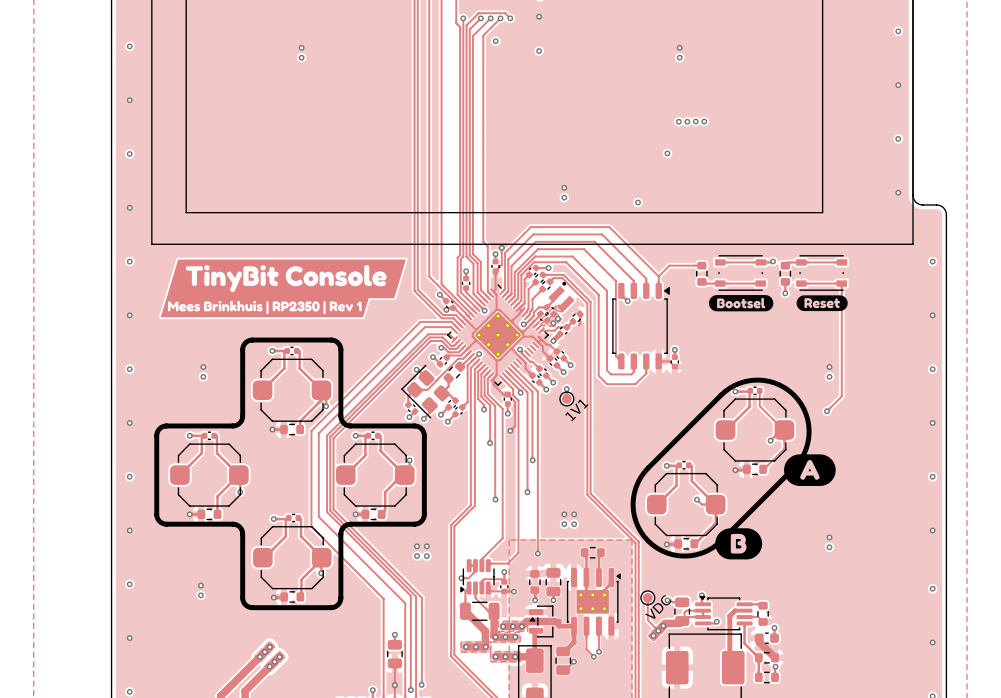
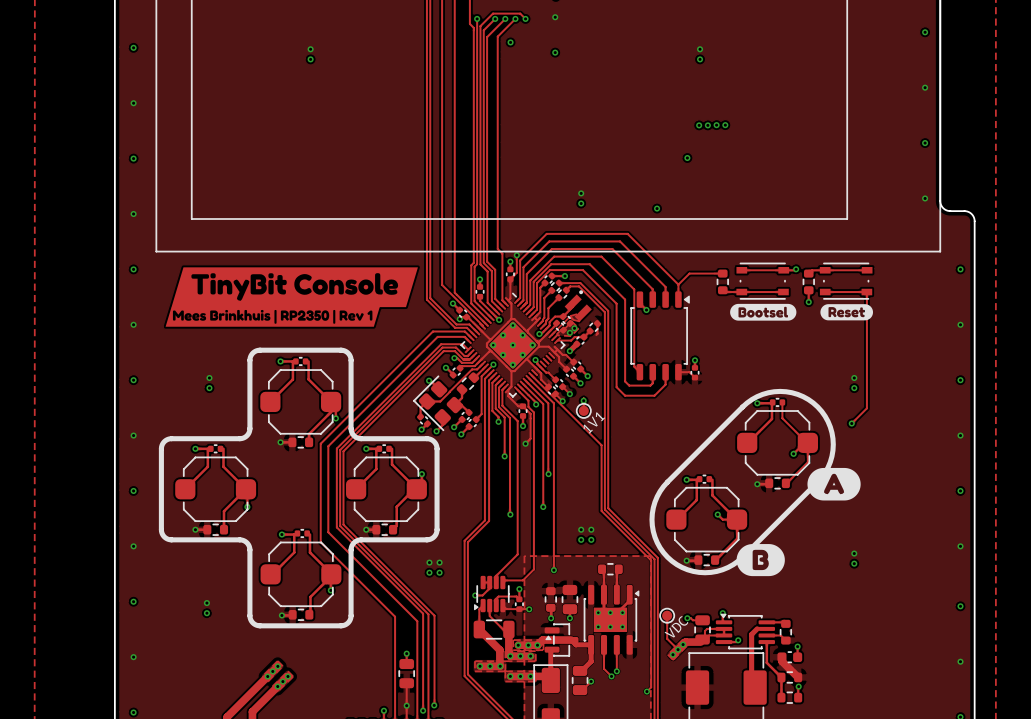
track: none -> (531, 375) (601, 445) (601, 510) (651, 560) (651, 687) (646, 691)
via: none -> (646, 691)

